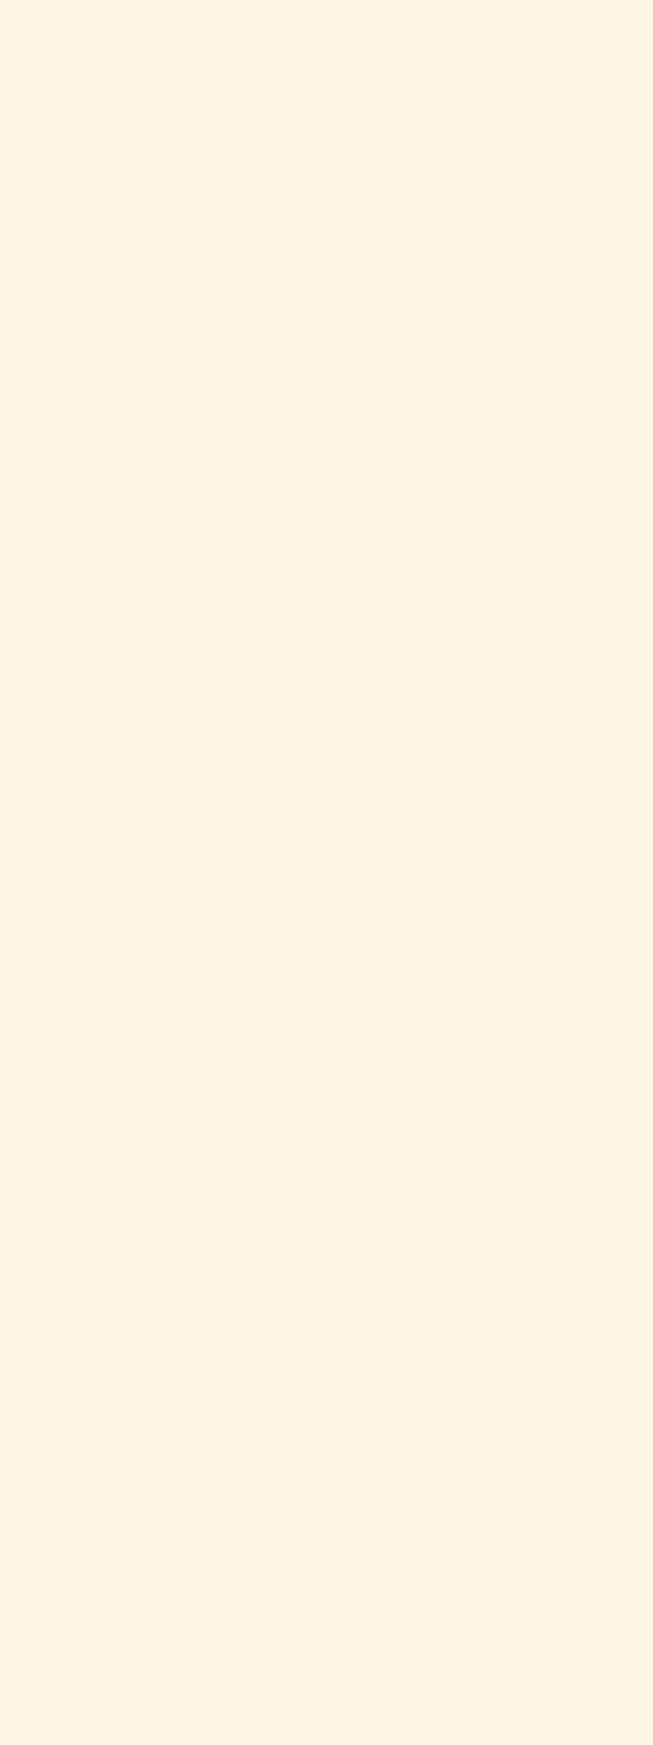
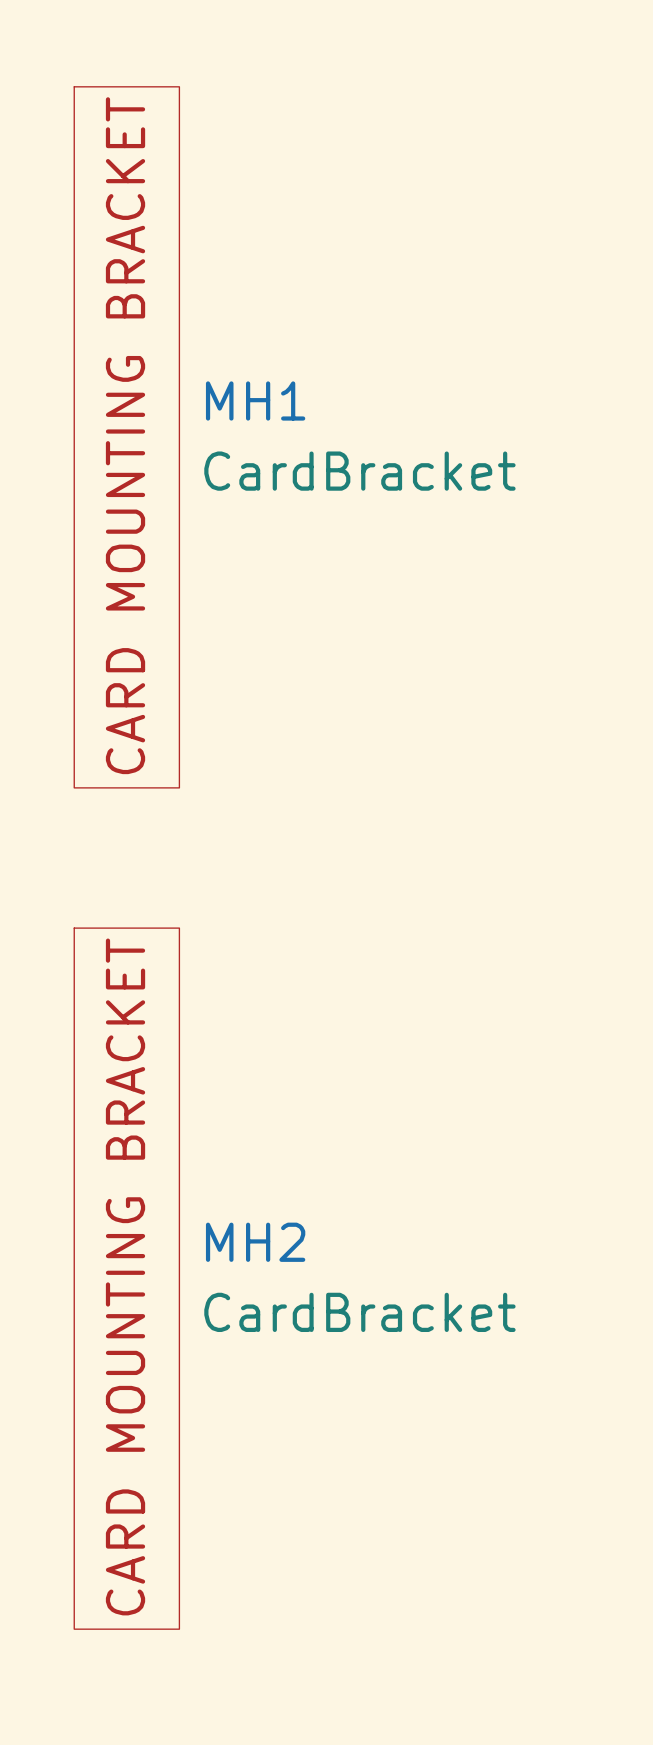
MH1: none -> CardBracket (126, 437)
MH2: none -> CardBracket (126, 1278)

